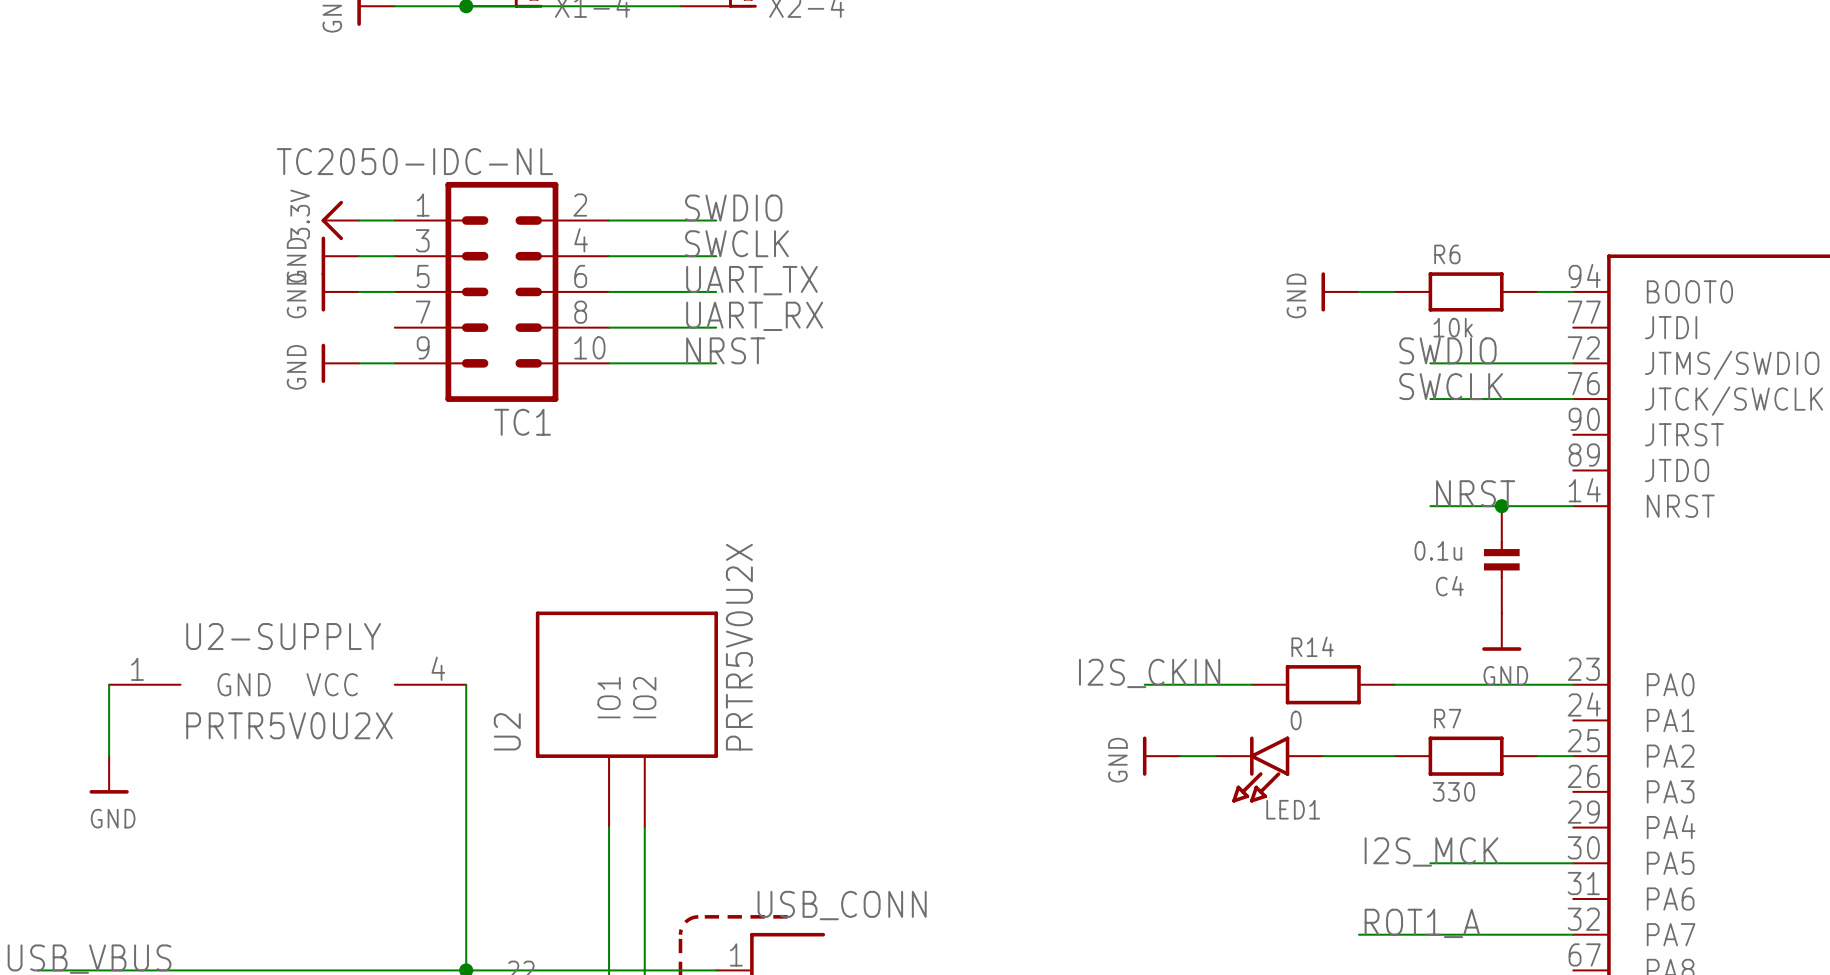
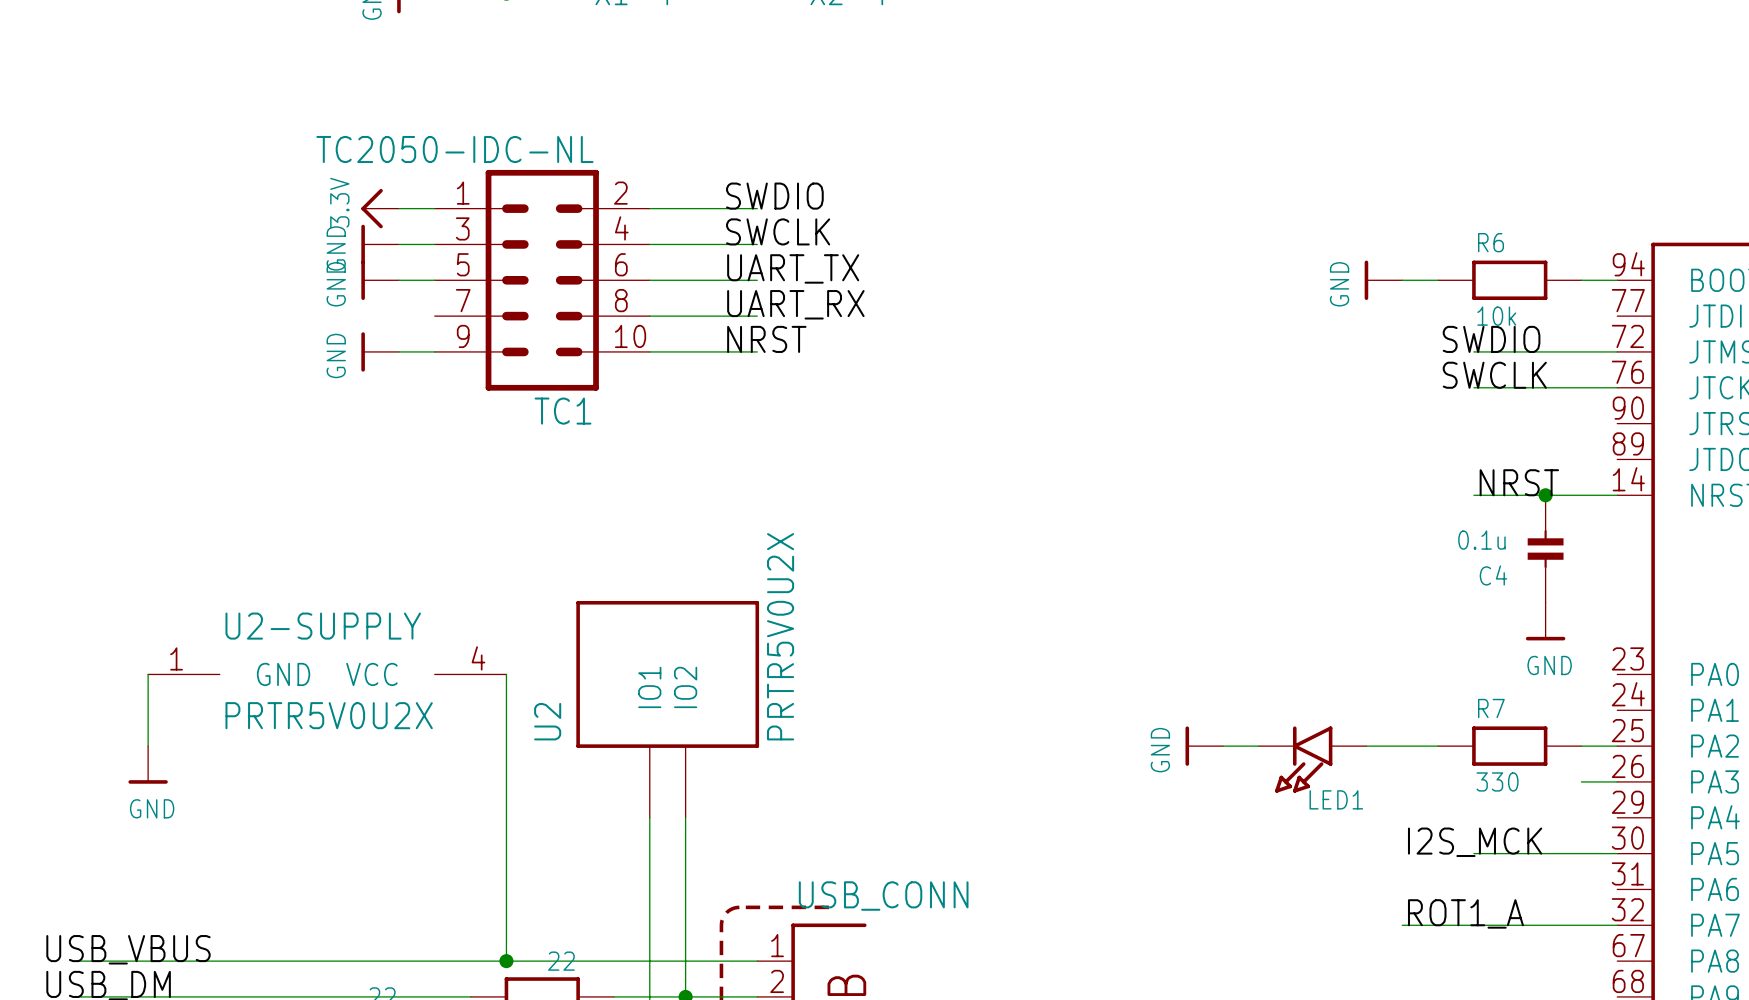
label: I2S_CKIN (1149, 673) -> none
wire: (1144, 684) (1251, 684) -> none
R14: 0 (1323, 684) -> none
wire: (1394, 684) (1573, 684) -> none
wire: none -> (1581, 781) (1617, 781)

